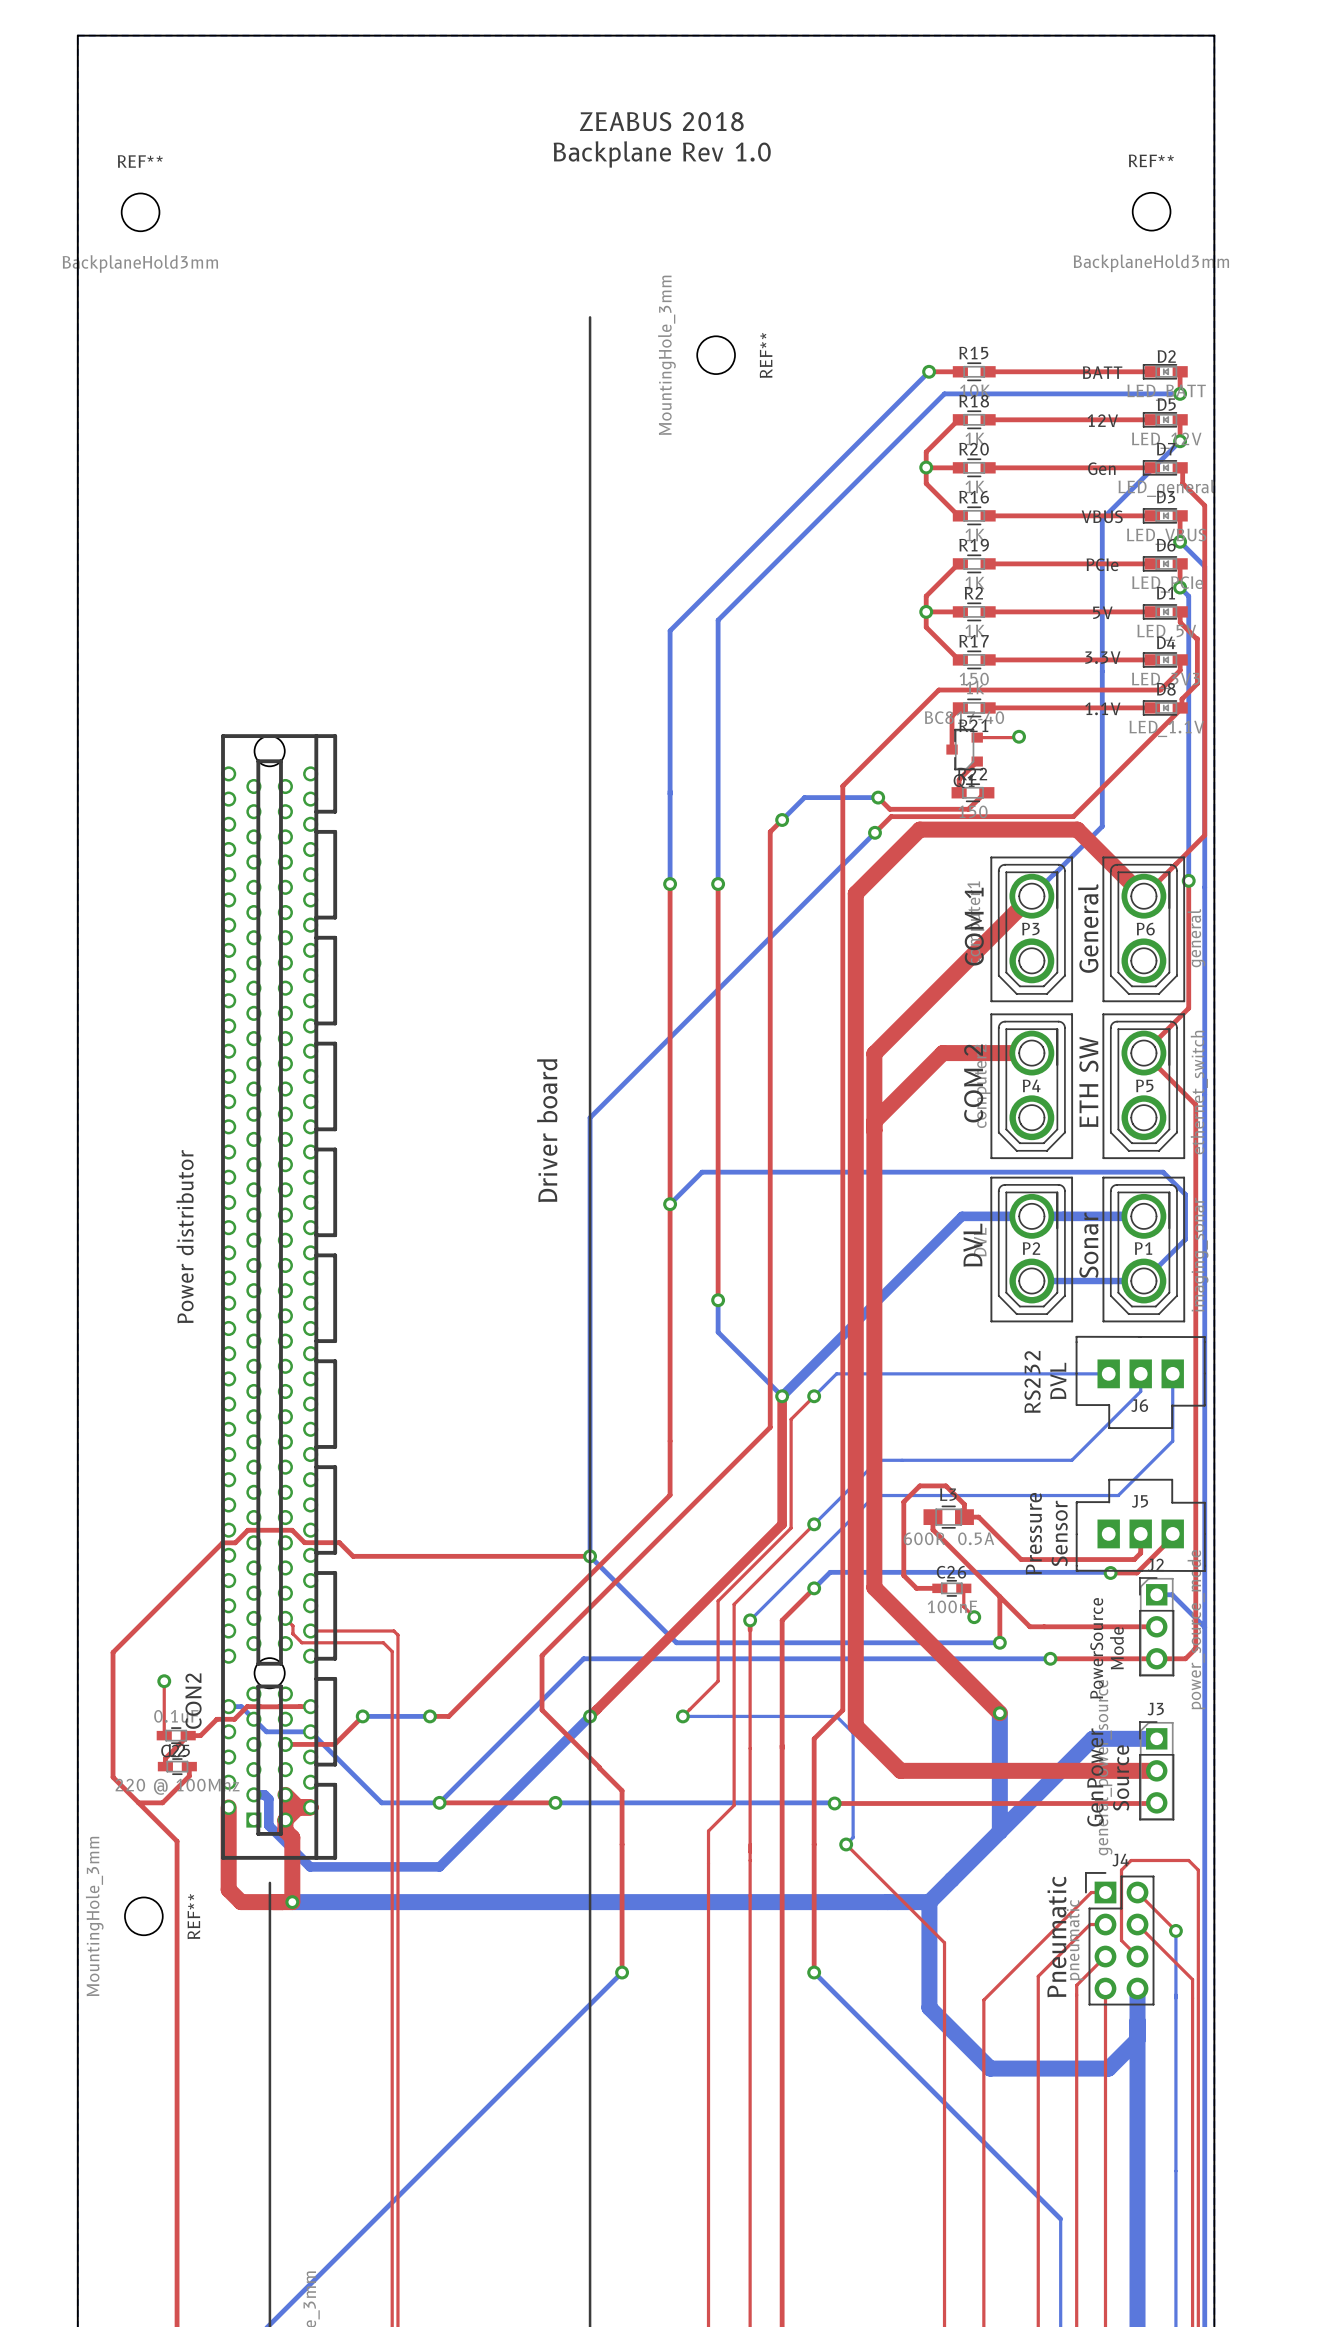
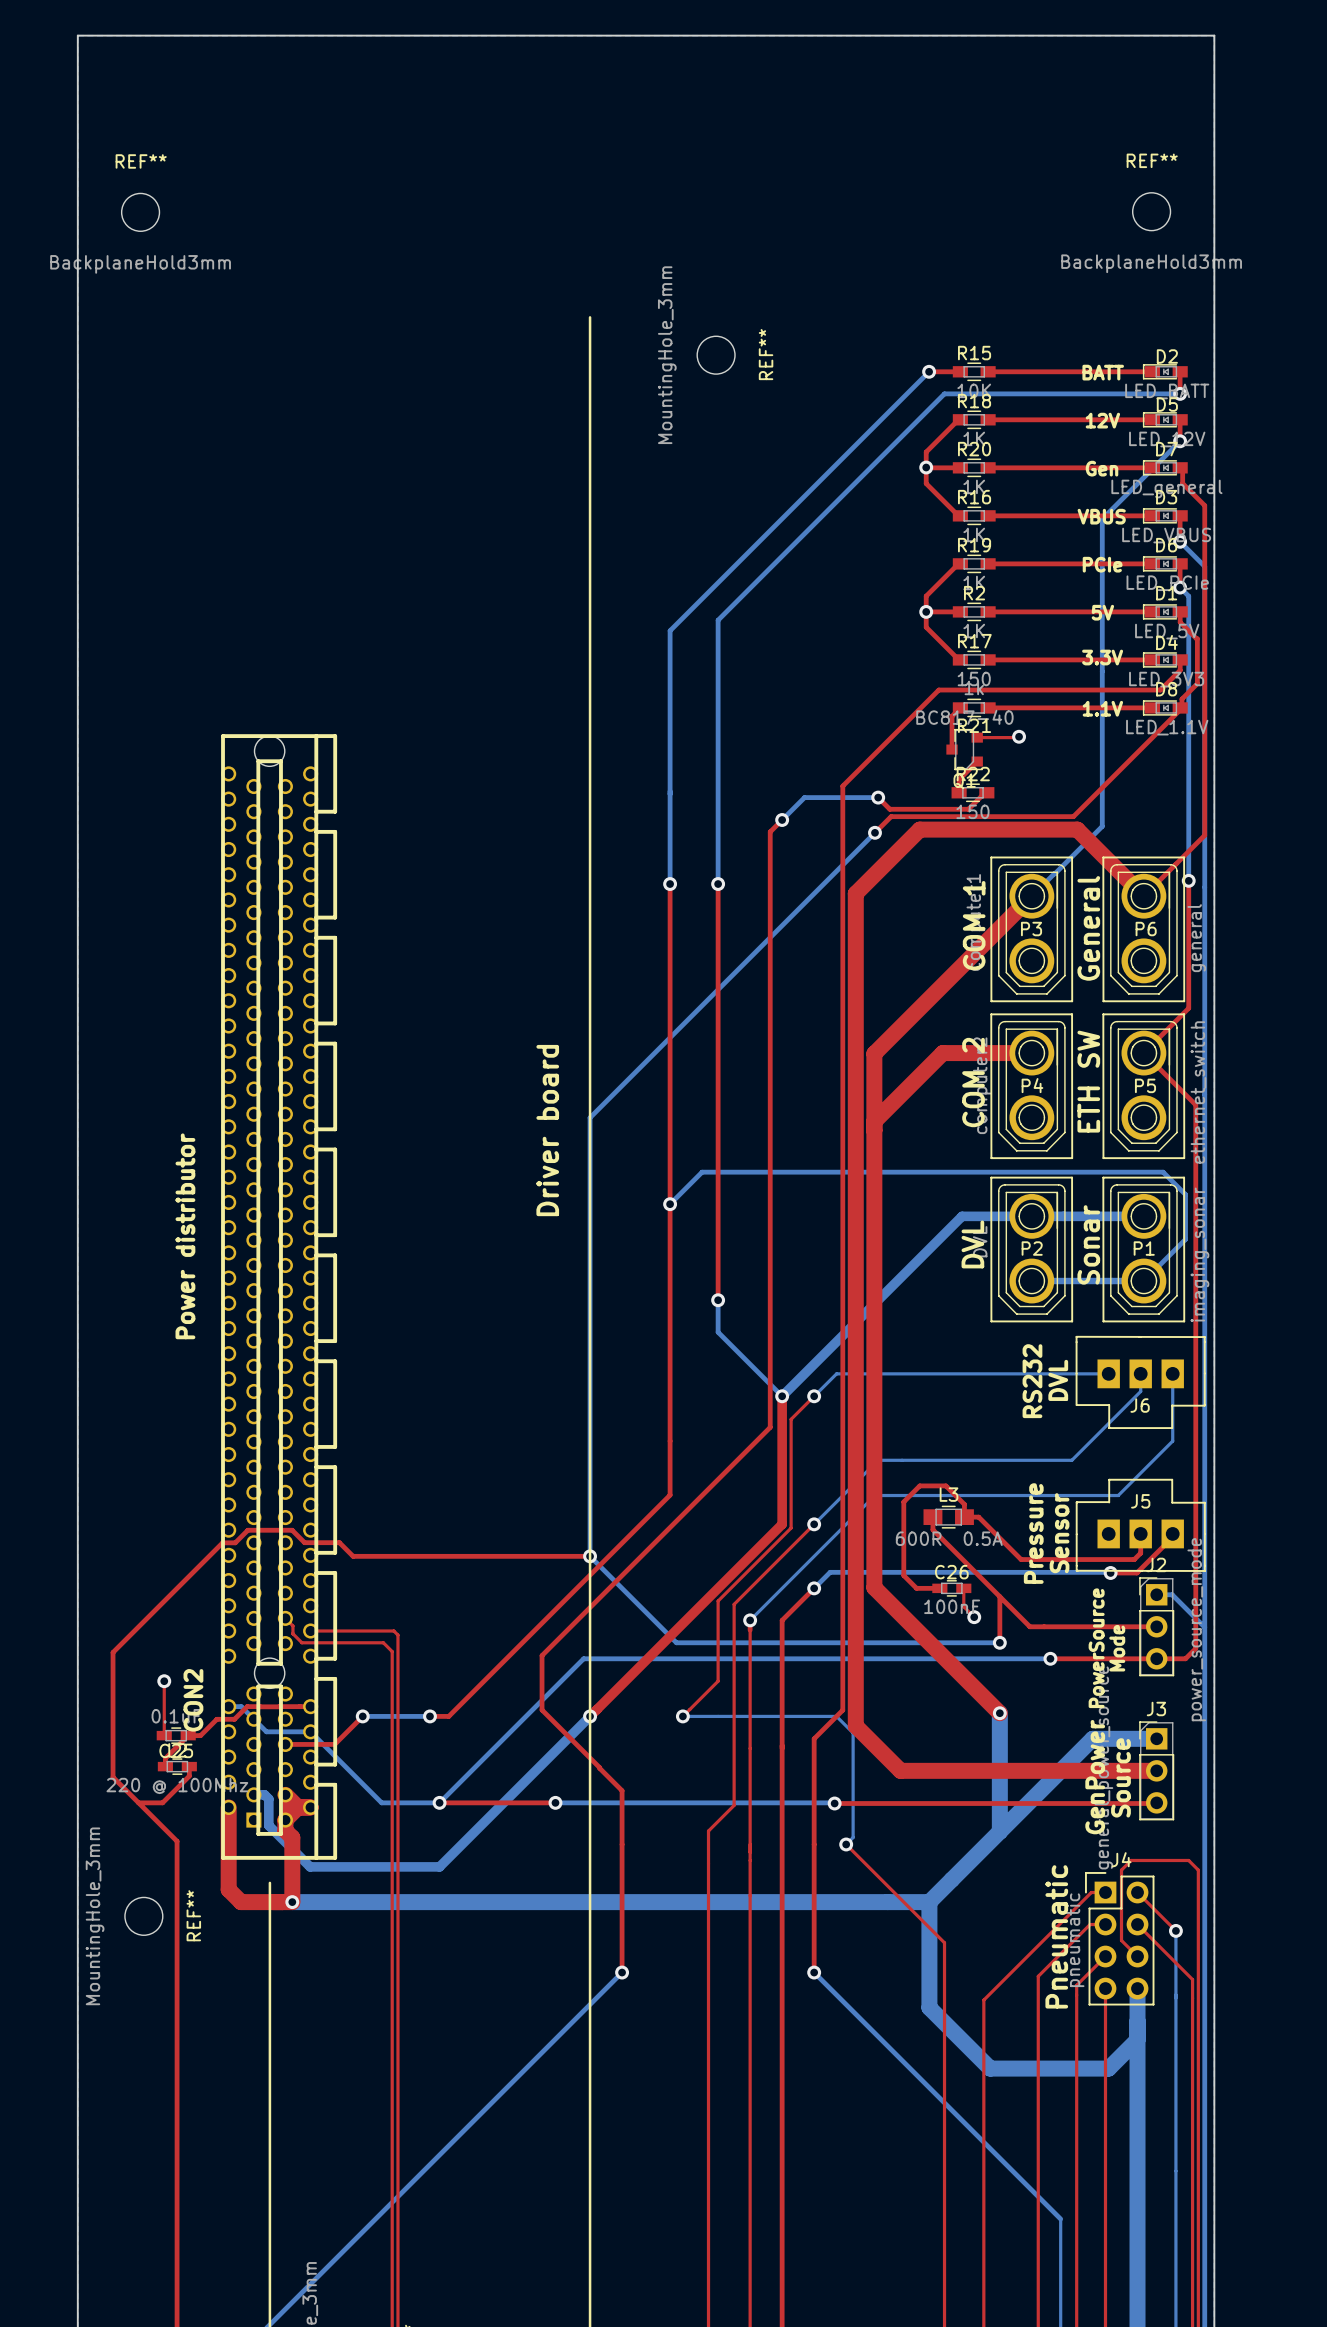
text: ZEABUS 2018 (661, 121) -> none
text: Backplane Rev 1.0 (662, 154) -> none

